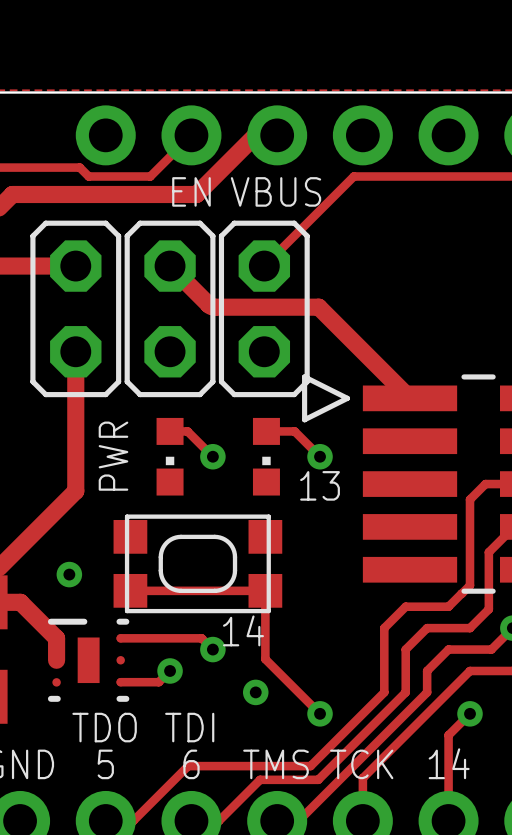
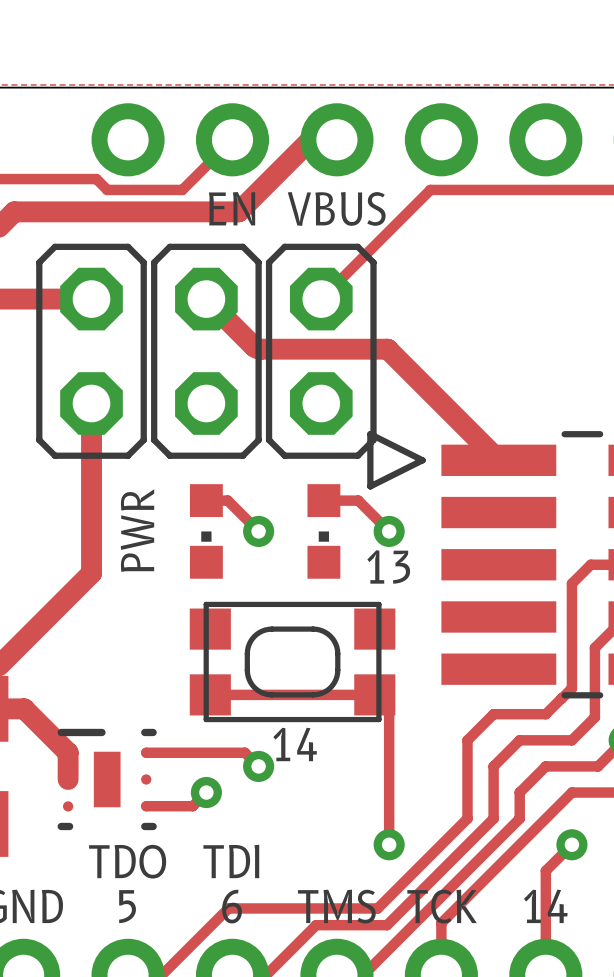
part position: (197, 563) -> (292, 661)
via: (69, 574) -> none
track: (130, 590) (173, 590) -> none
track: (265, 590) (265, 659) (320, 713) -> (322, 694) (374, 694) (389, 709) (389, 844)
via: (255, 692) -> none

